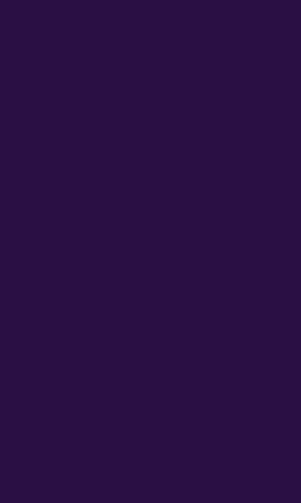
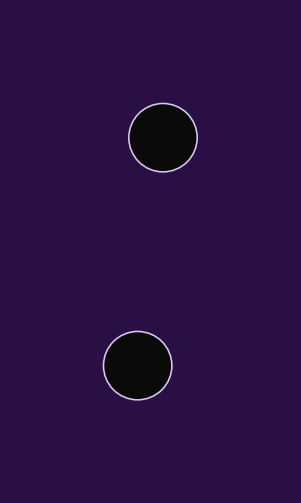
part: none -> (163, 137)
part: none -> (137, 365)

